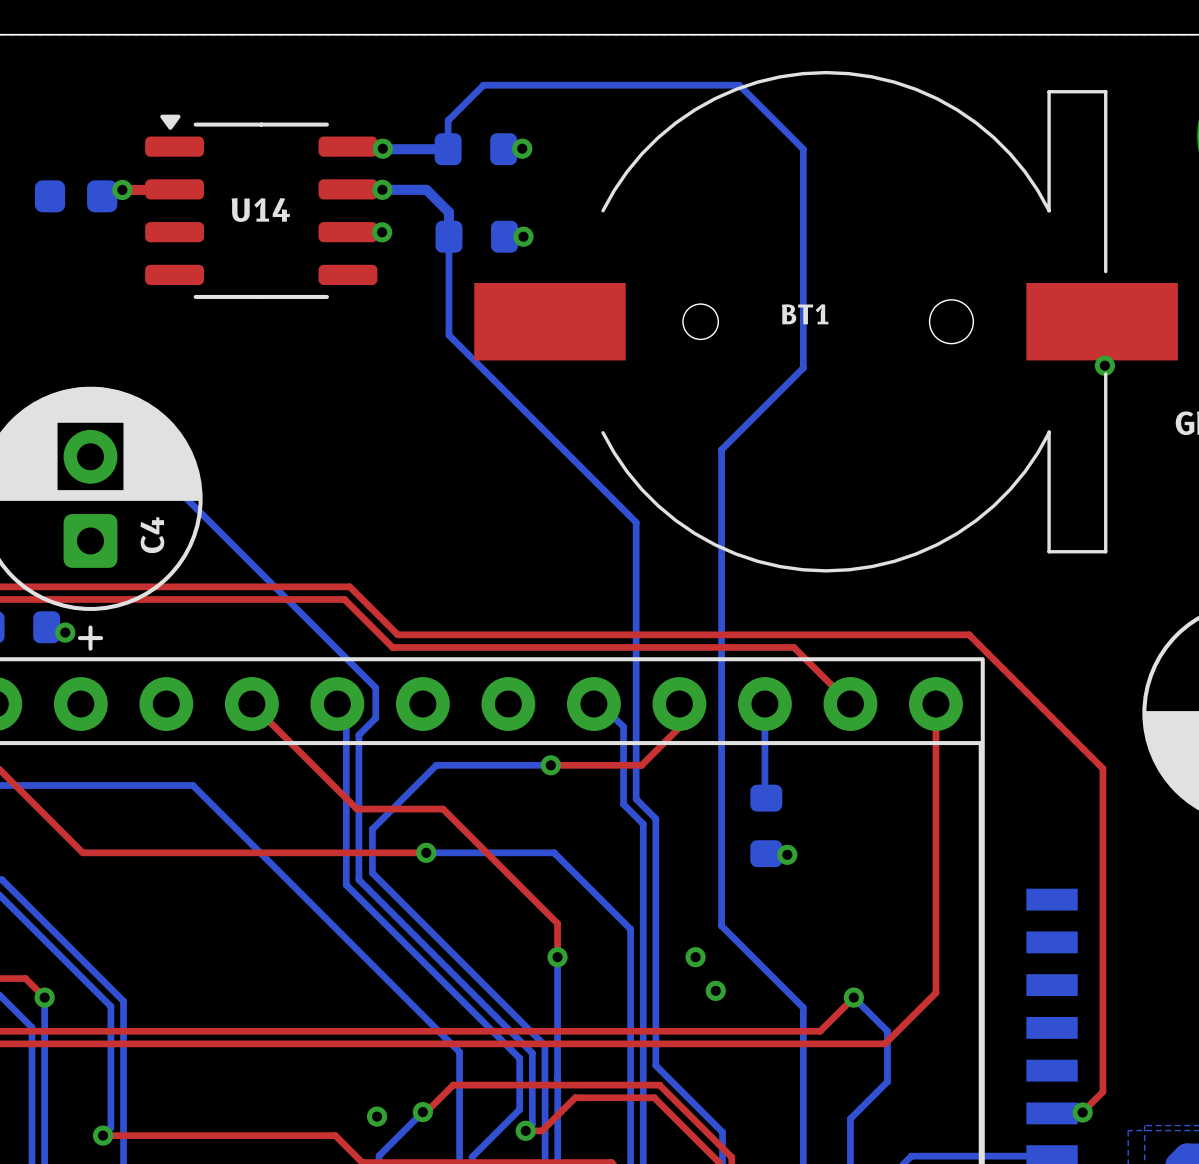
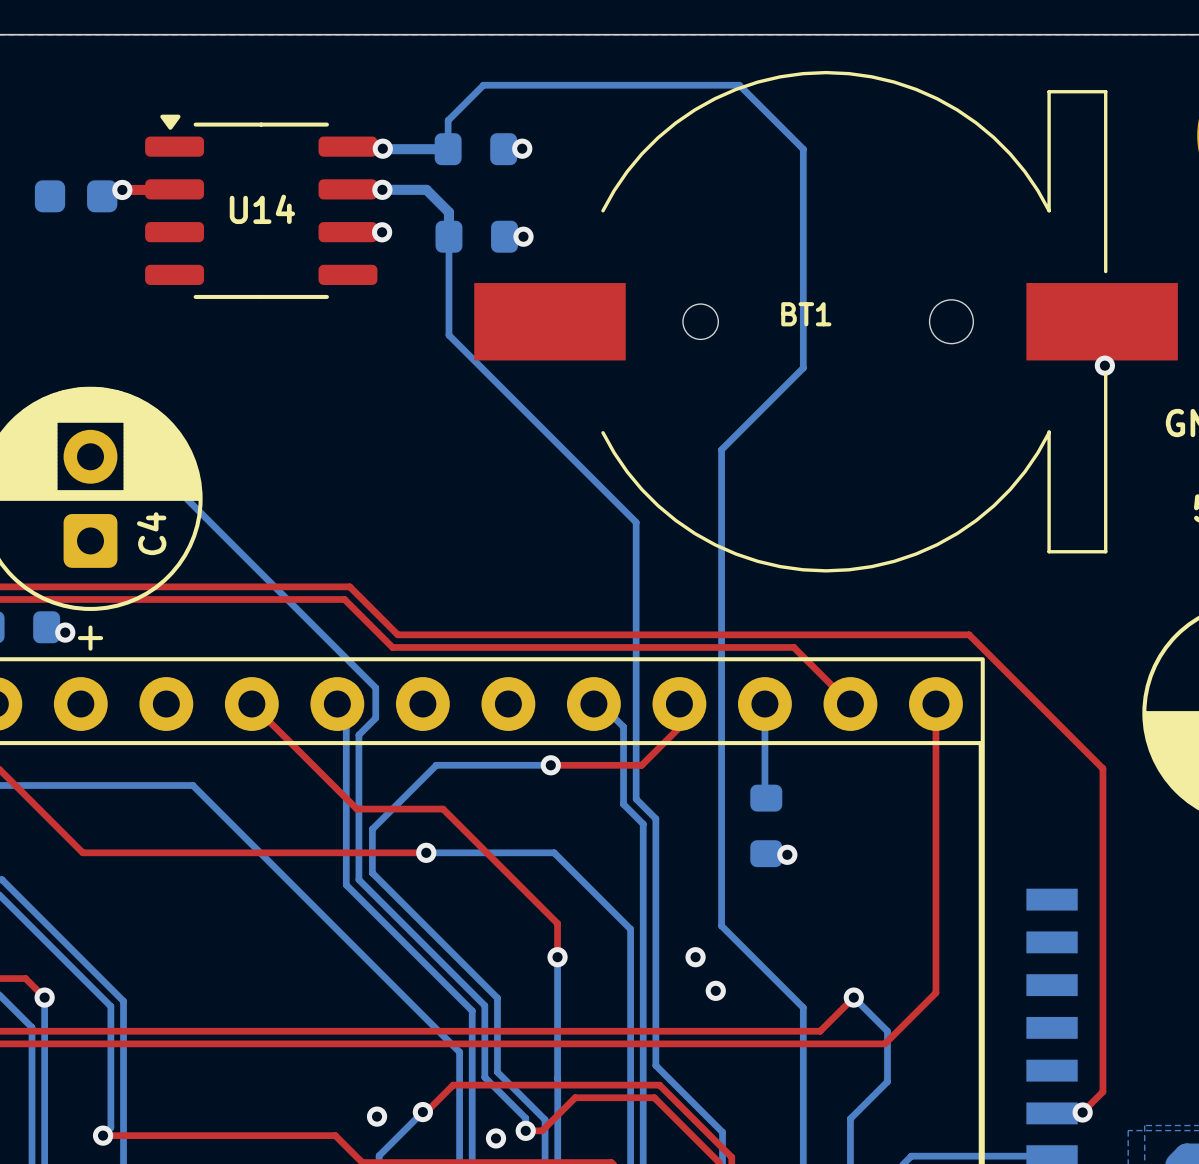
bottom track: (497, 998) (544, 1045) (544, 1083) -> (497, 998) (497, 1072) (545, 1119)
bottom track: (484, 1005) (532, 1053) (532, 1124) (525, 1130) -> (484, 1005) (484, 1077) (525, 1118) (525, 1130)
bottom track: (472, 1010) (519, 1058) (519, 1109) (472, 1157) -> (472, 1010) (472, 1157)
bottom track: (545, 1083) (545, 1119) -> none
via: none -> (496, 1138)

